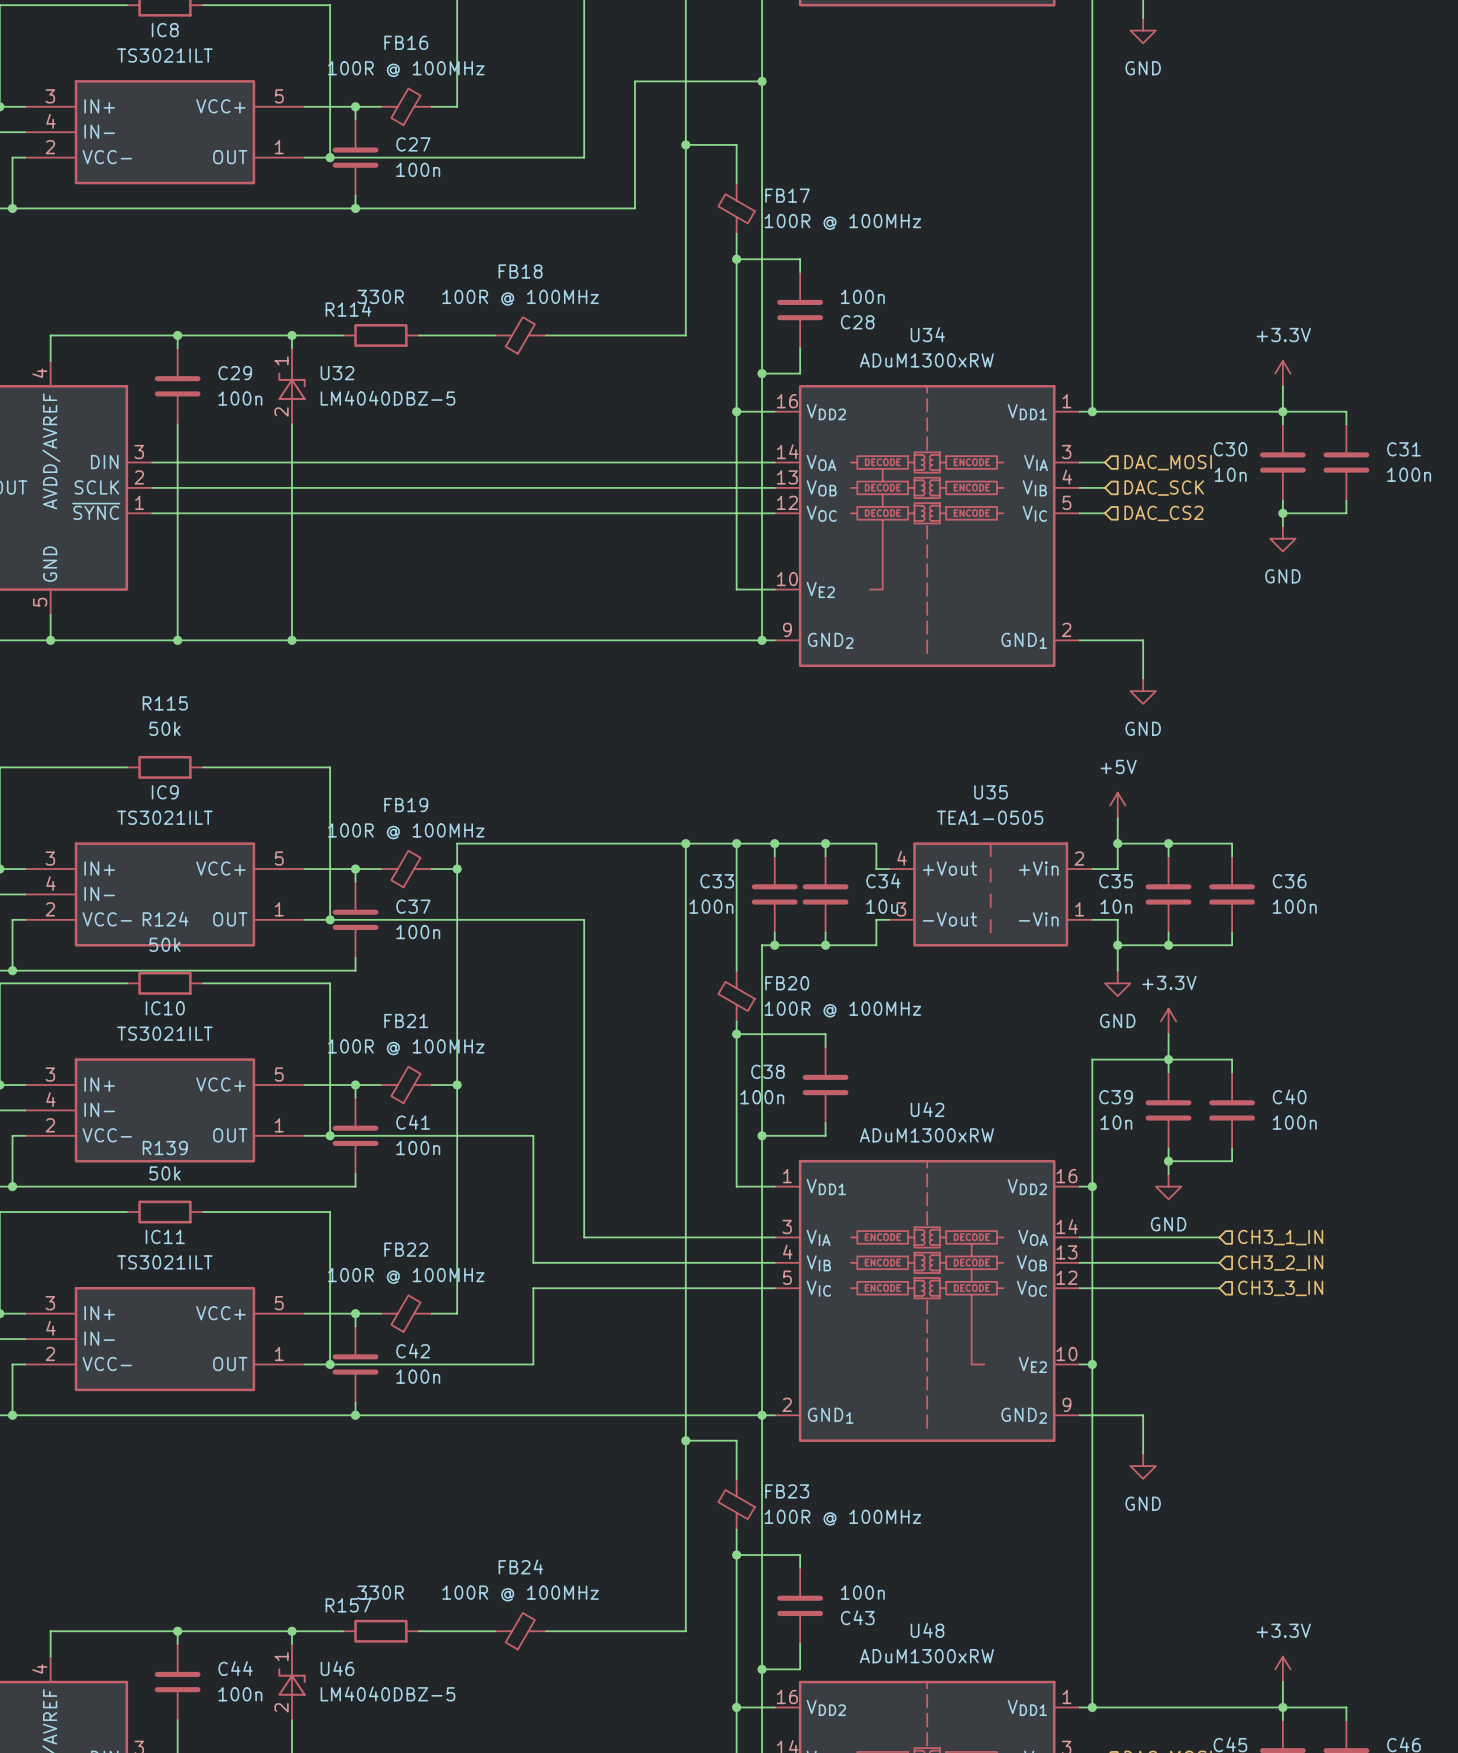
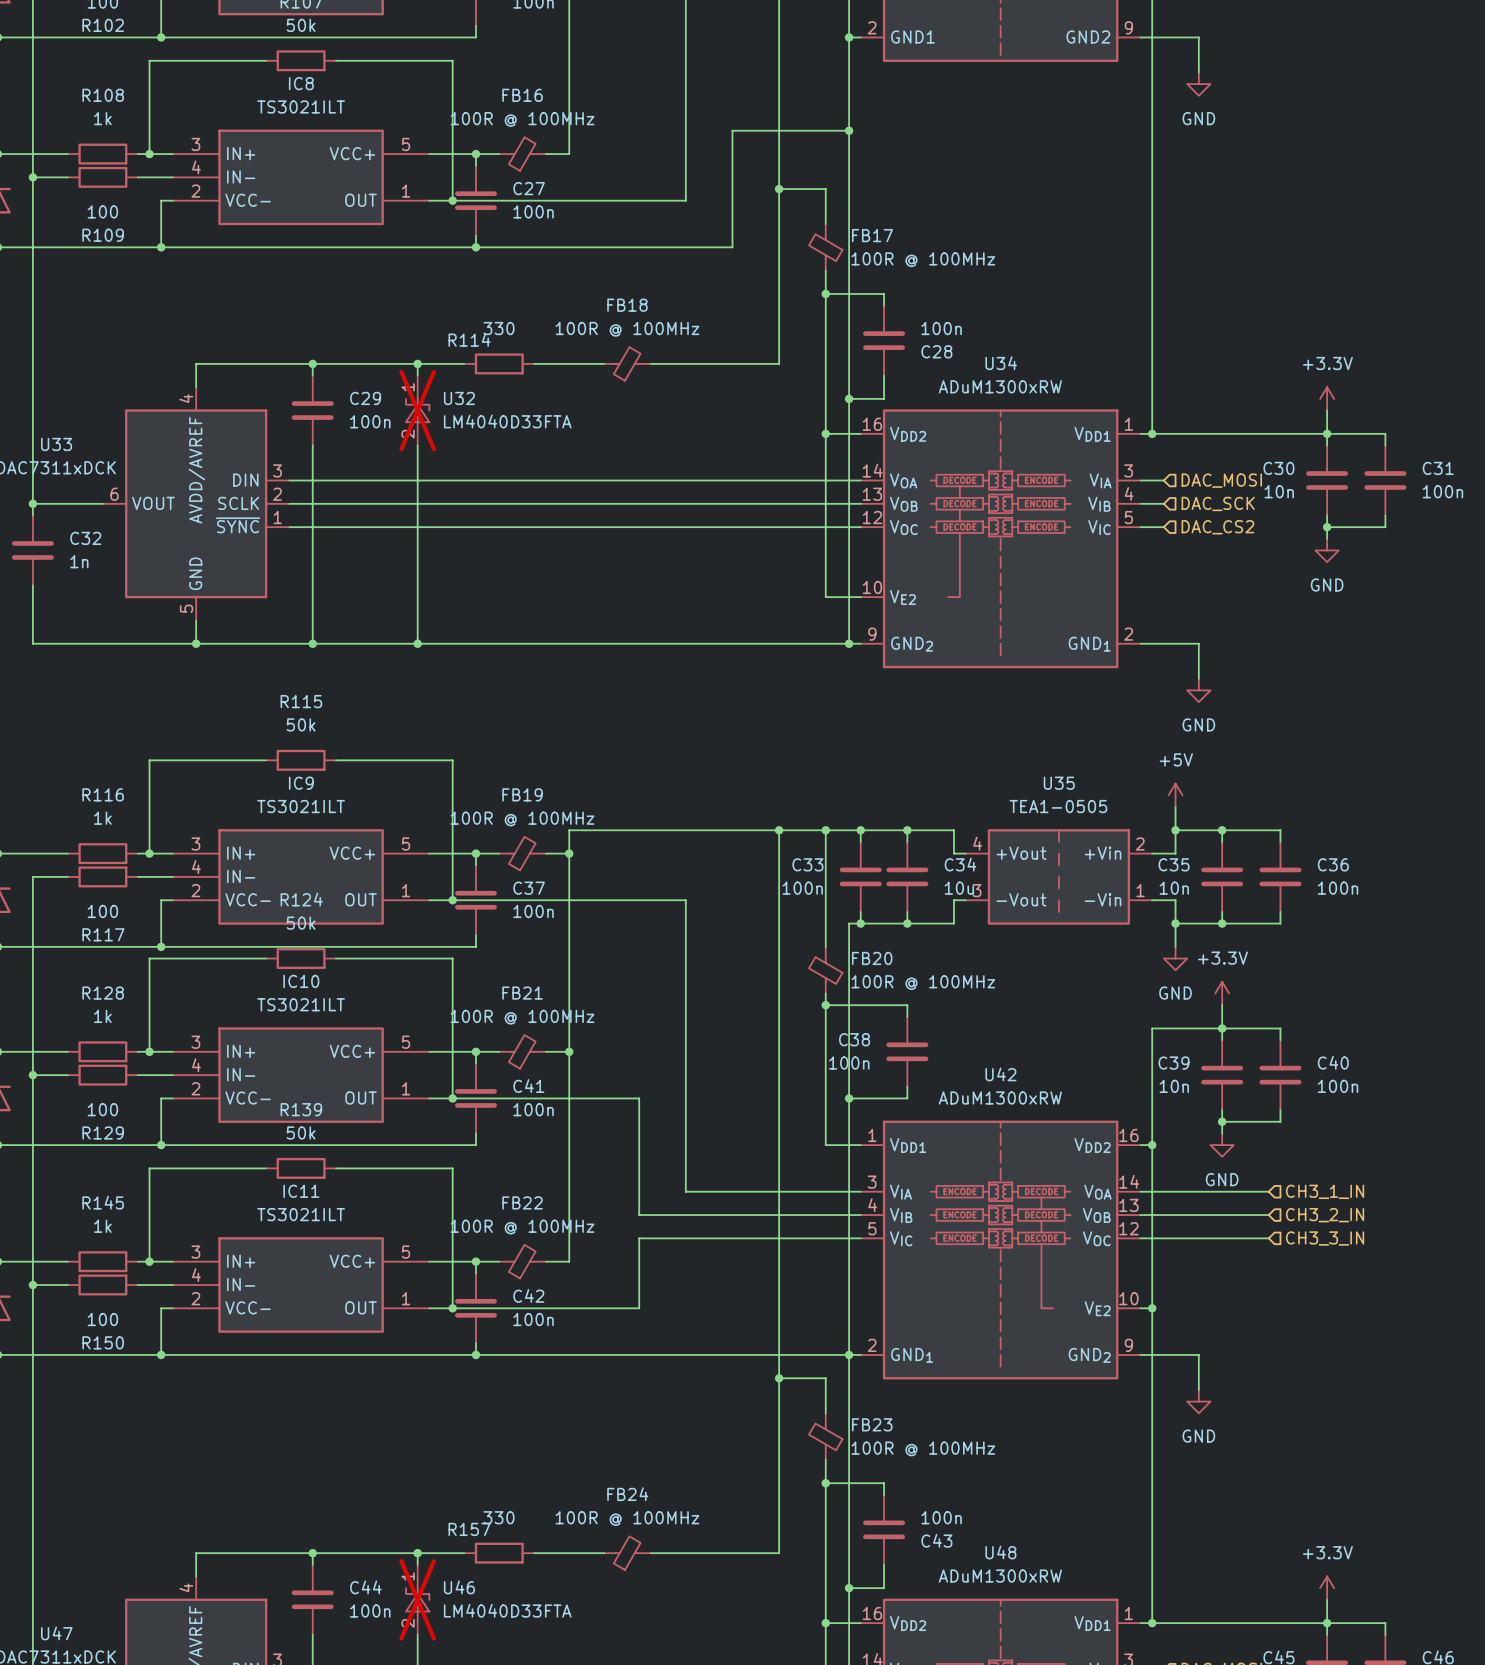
R114 value: 330R (380, 296) -> 330 (499, 328)
U32 do-not-place cross: none -> (417, 410)
U32 value: LM4040DBZ-5 (387, 398) -> LM4040D33FTA (507, 421)
R157 value: 330R (380, 1592) -> 330 (499, 1517)
U46 do-not-place cross: none -> (417, 1599)
U46 value: LM4040DBZ-5 (387, 1693) -> LM4040D33FTA (507, 1610)

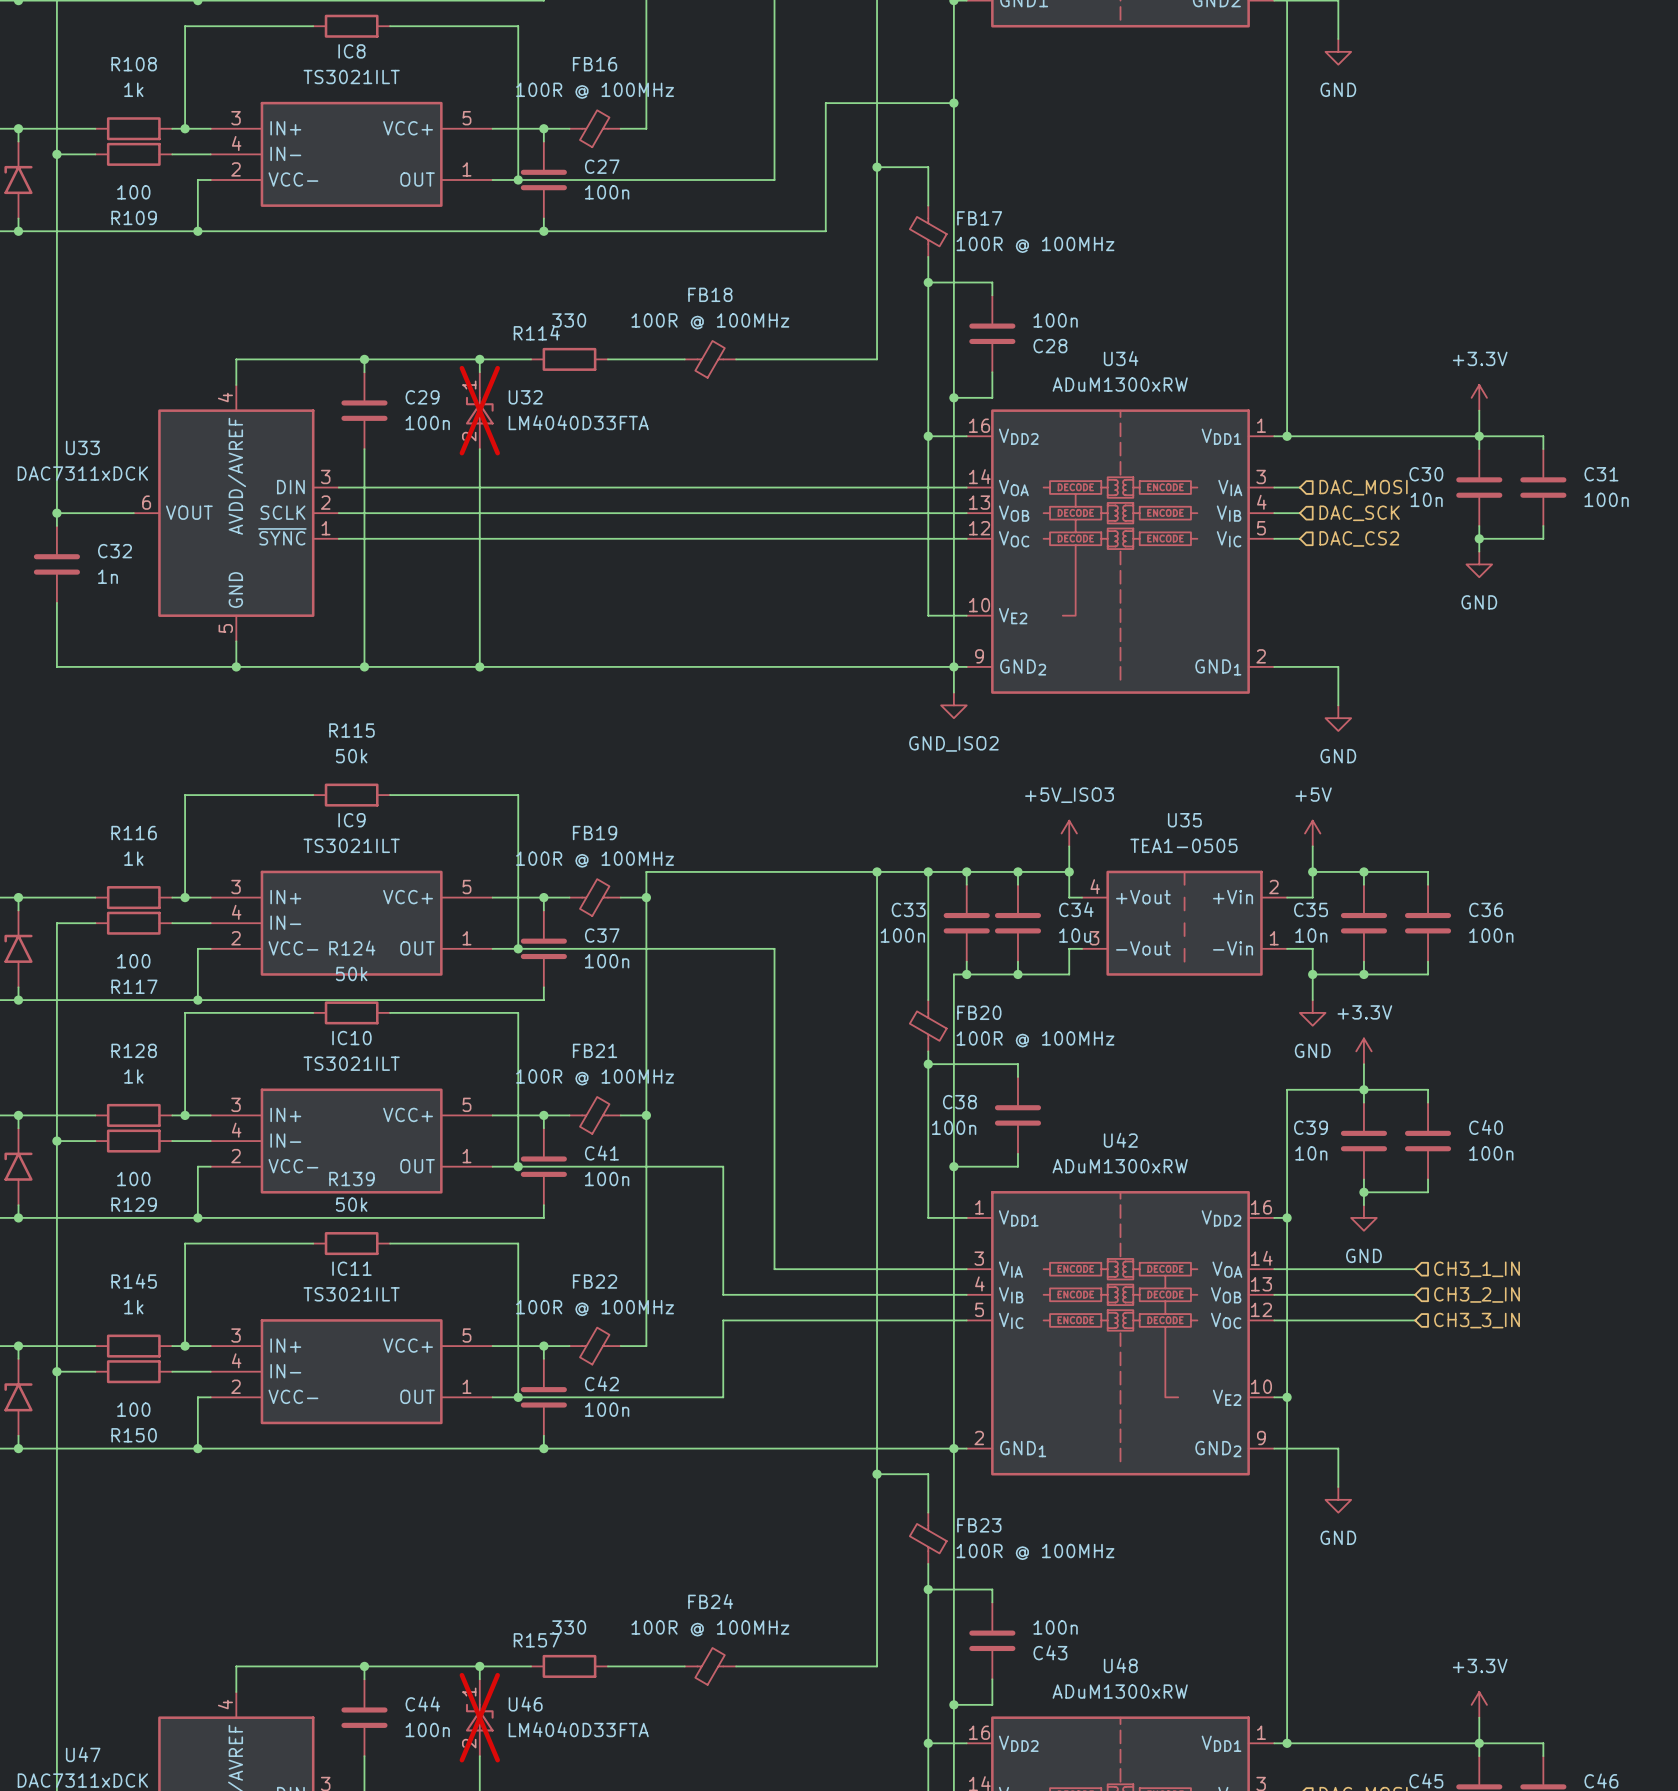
wire: none -> (953, 666) (953, 692)
power symbol: none -> GND_ISO2 (953, 705)
power symbol: none -> +5V_ISO3 (1069, 833)
wire: none -> (1069, 846) (1069, 871)
junction: none -> (1069, 871)

